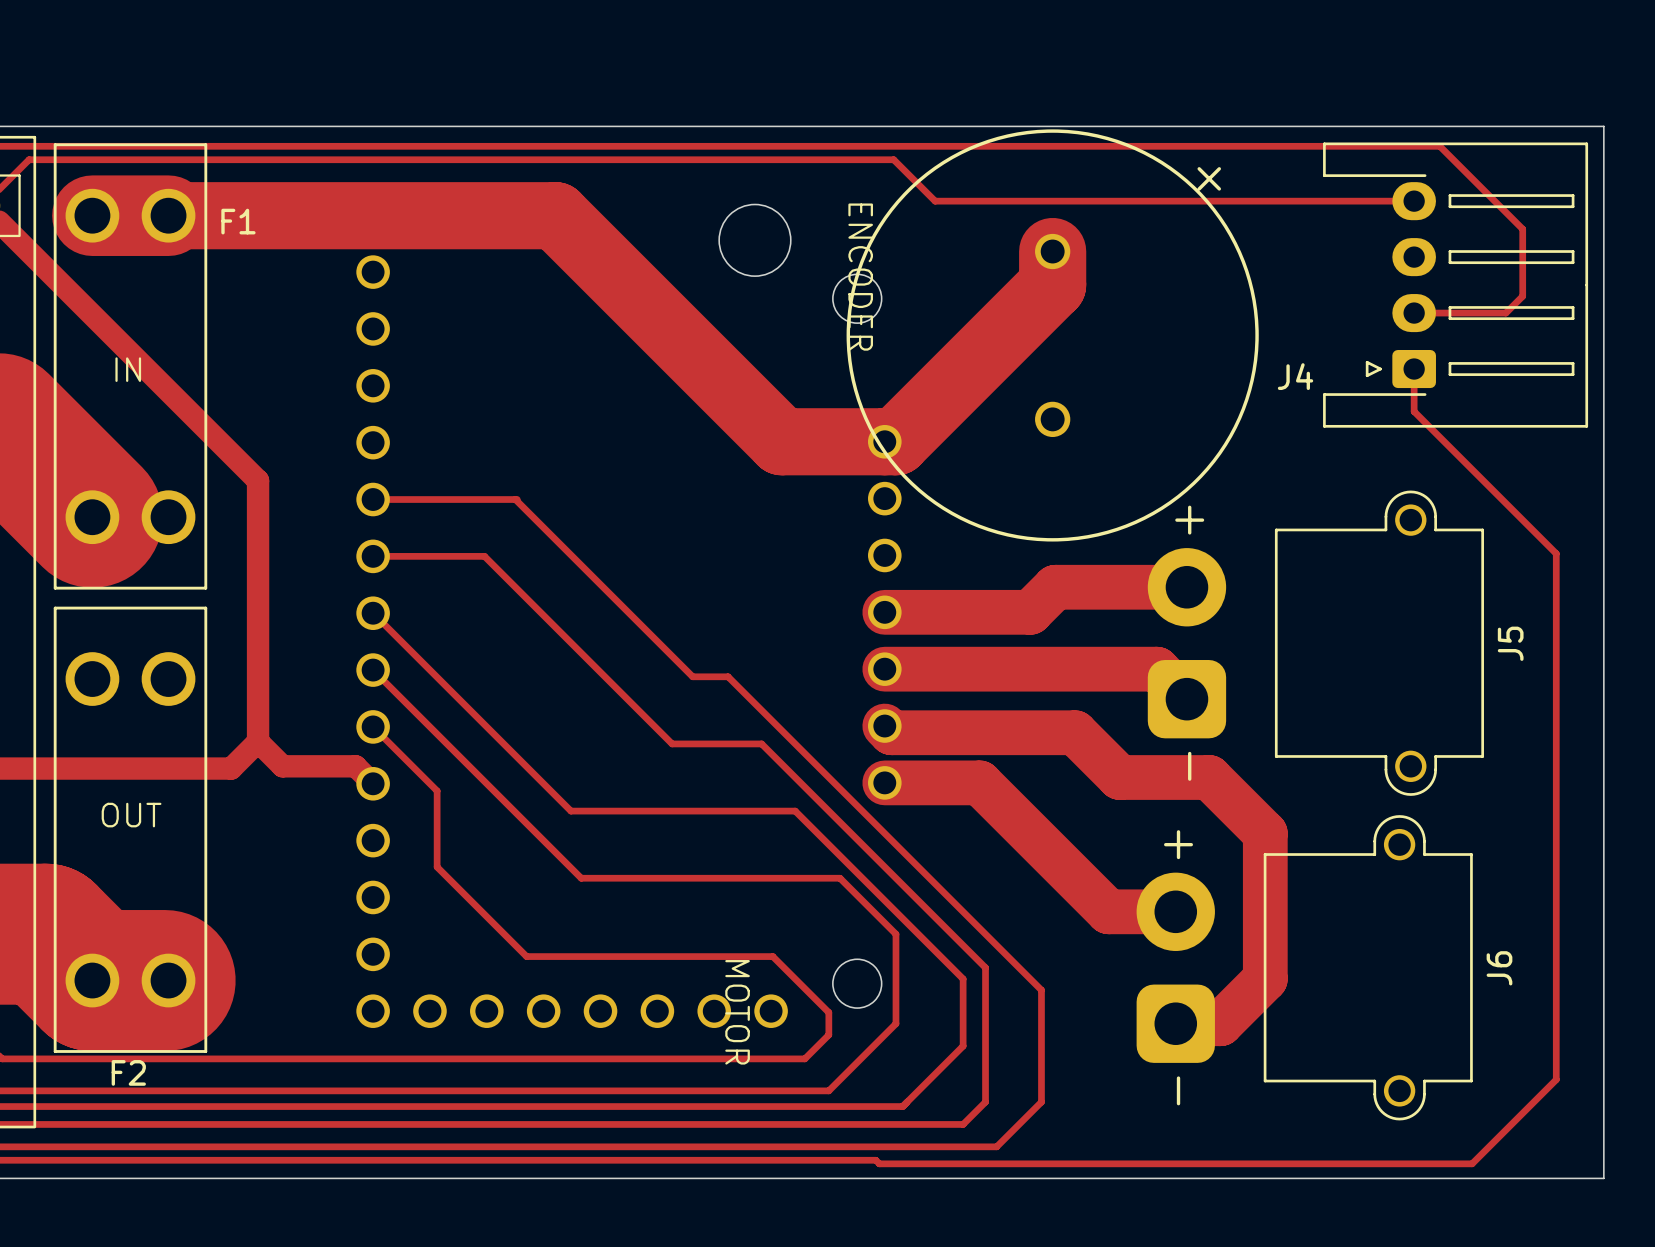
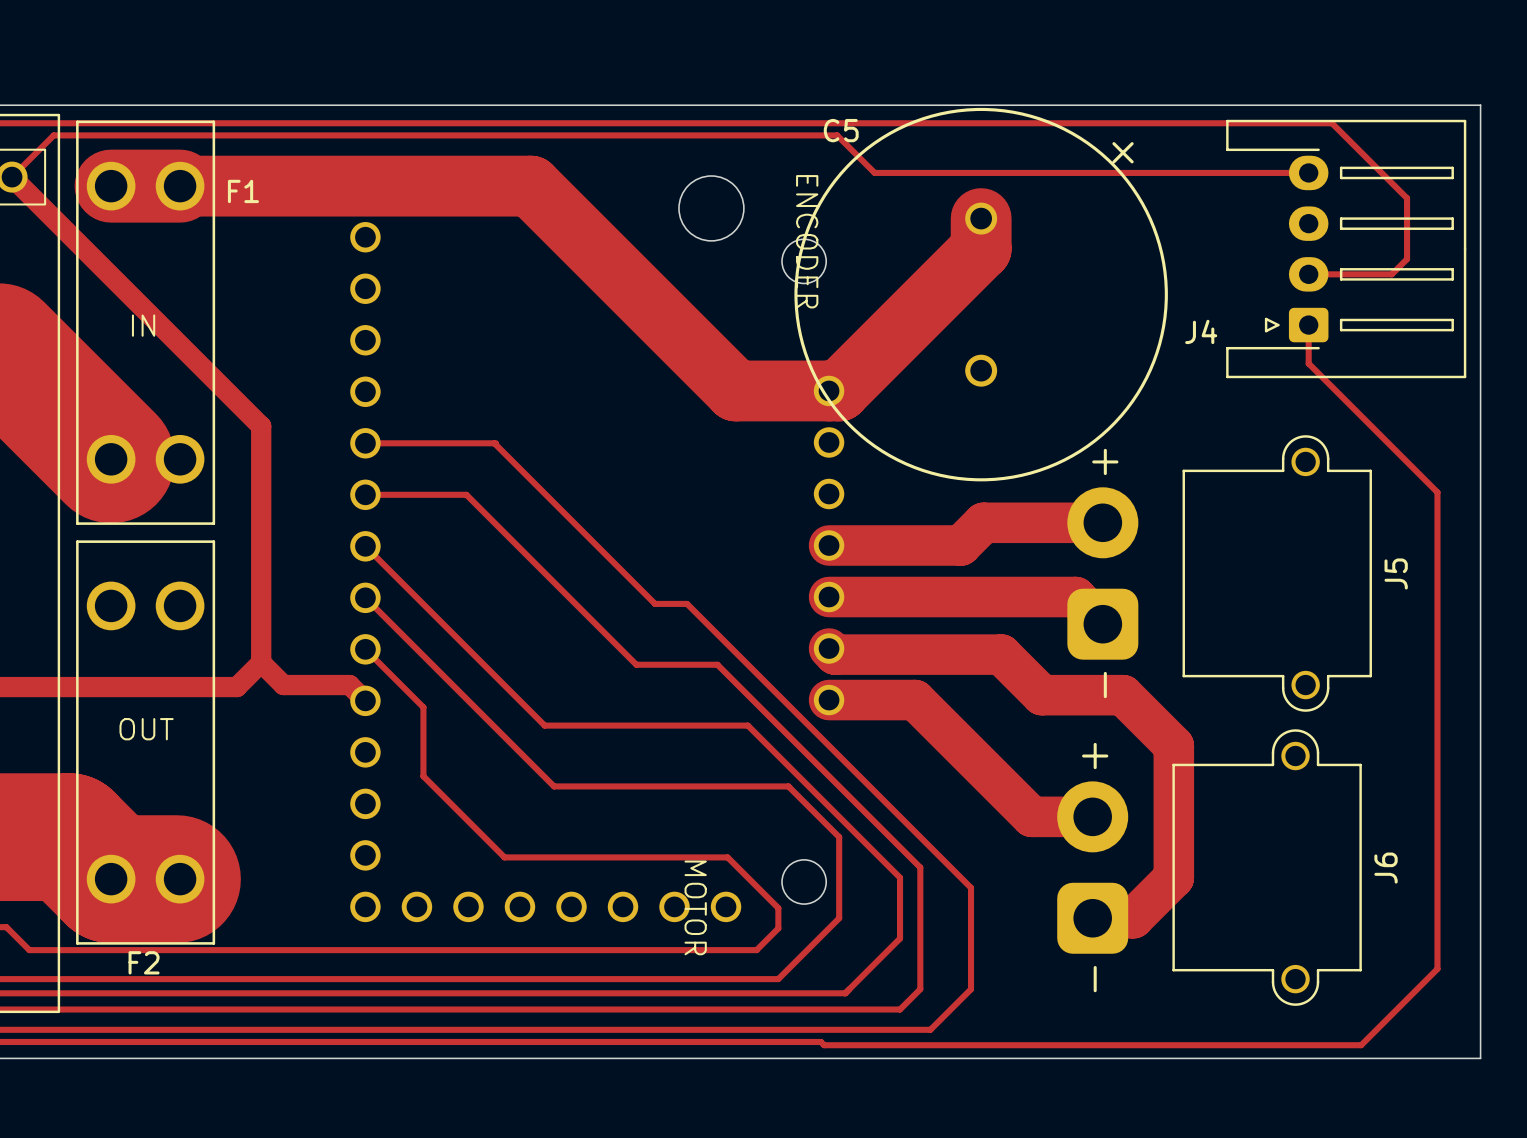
C5 name: none -> C5 (841, 130)

